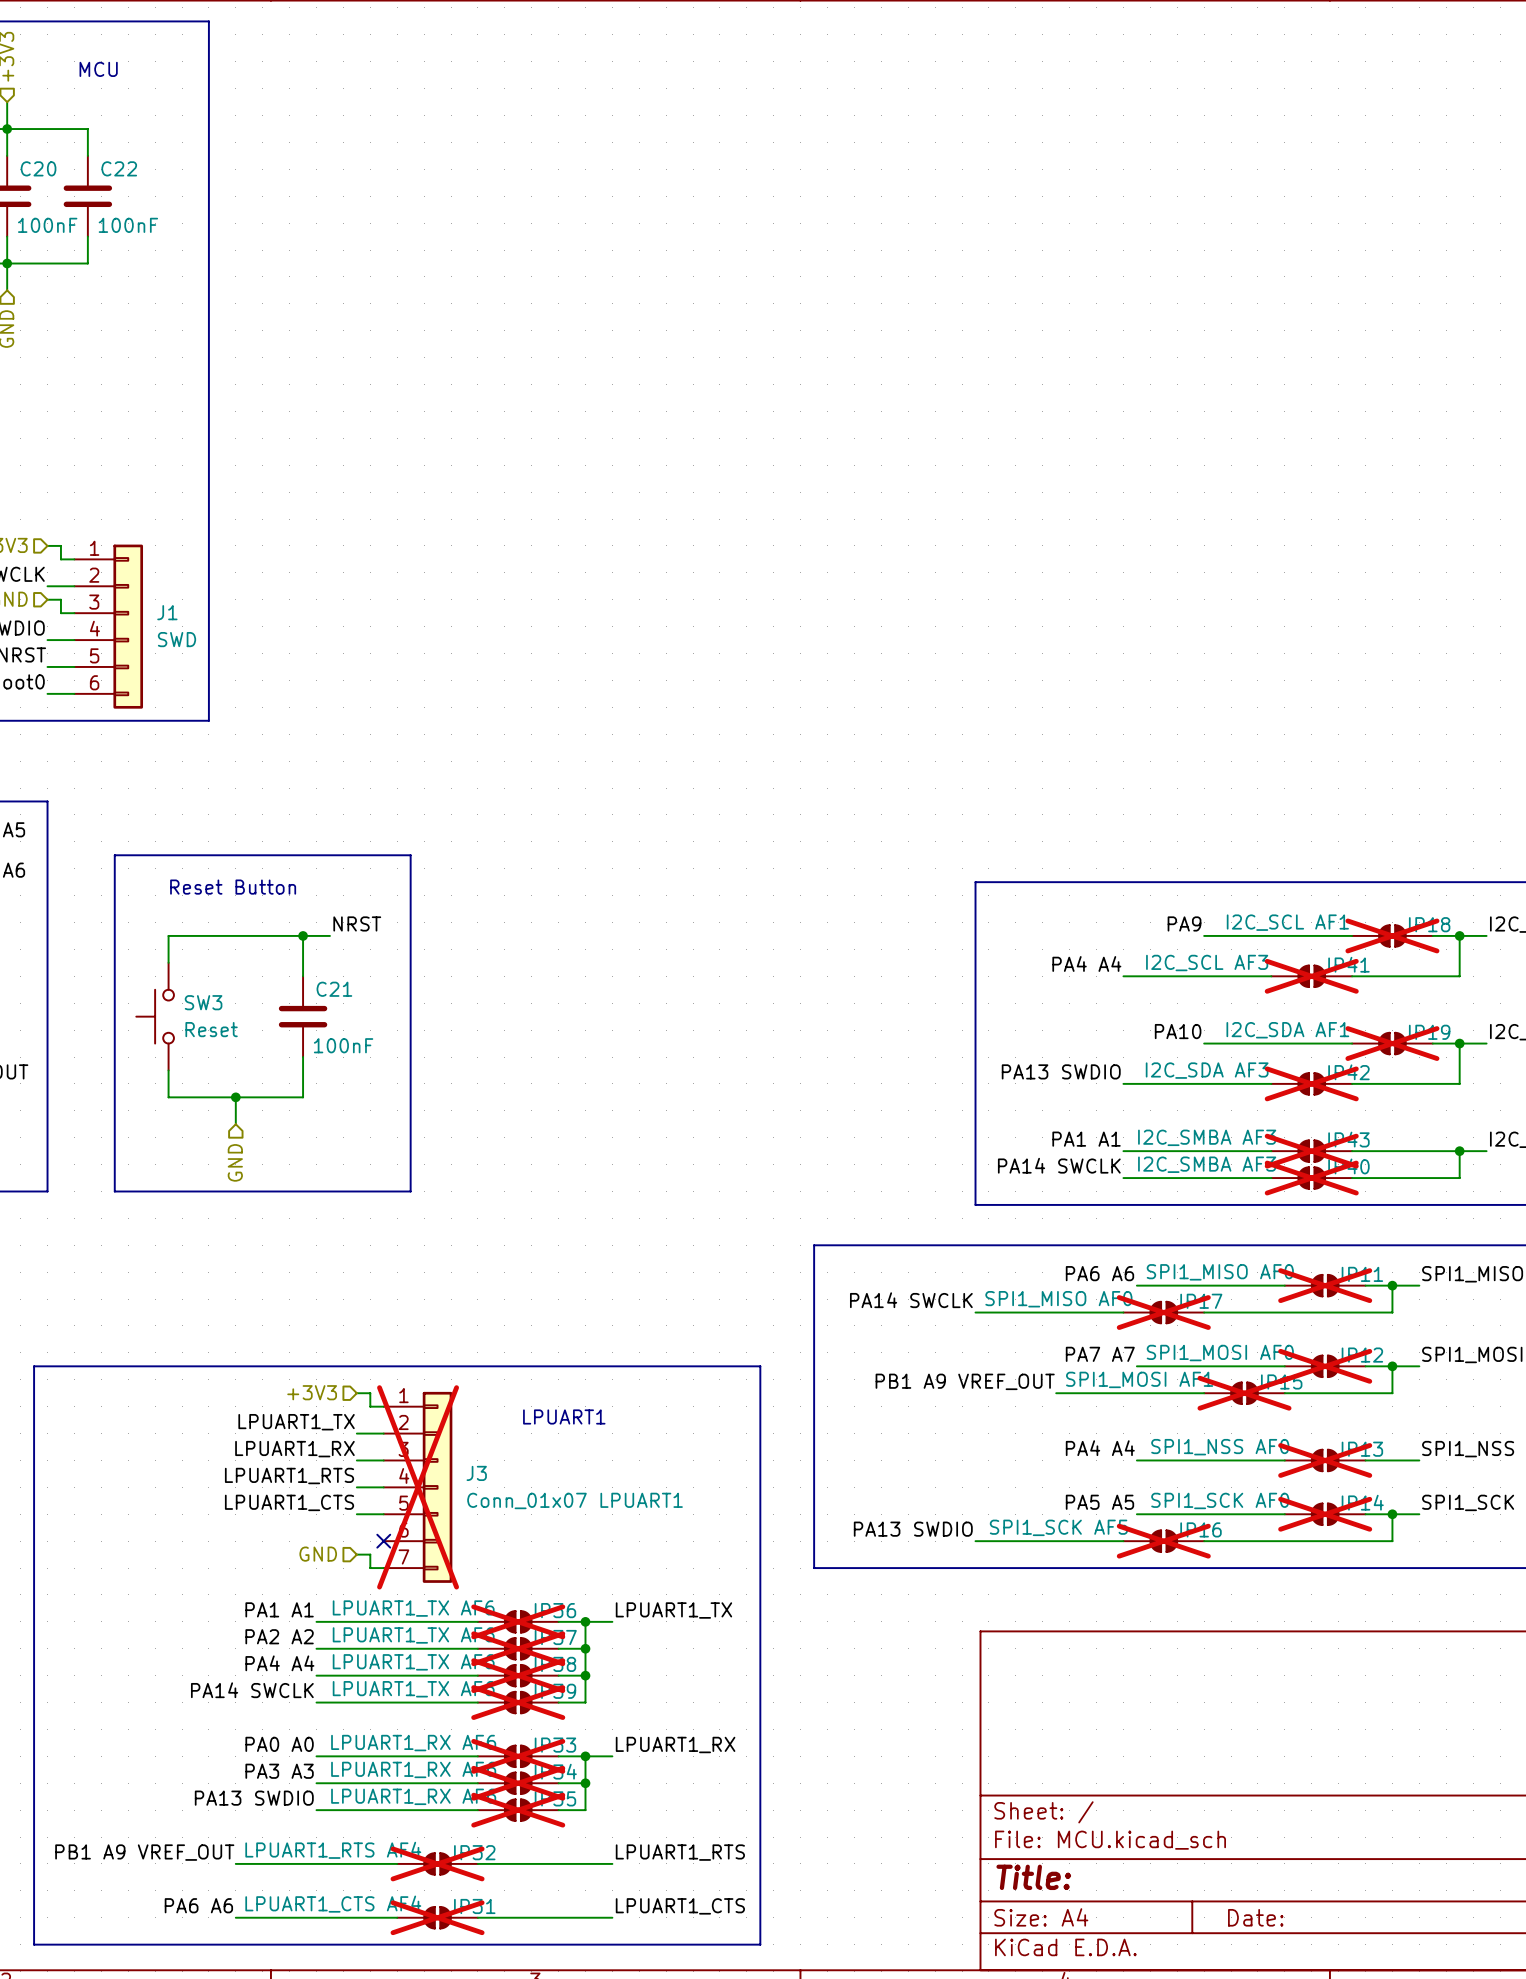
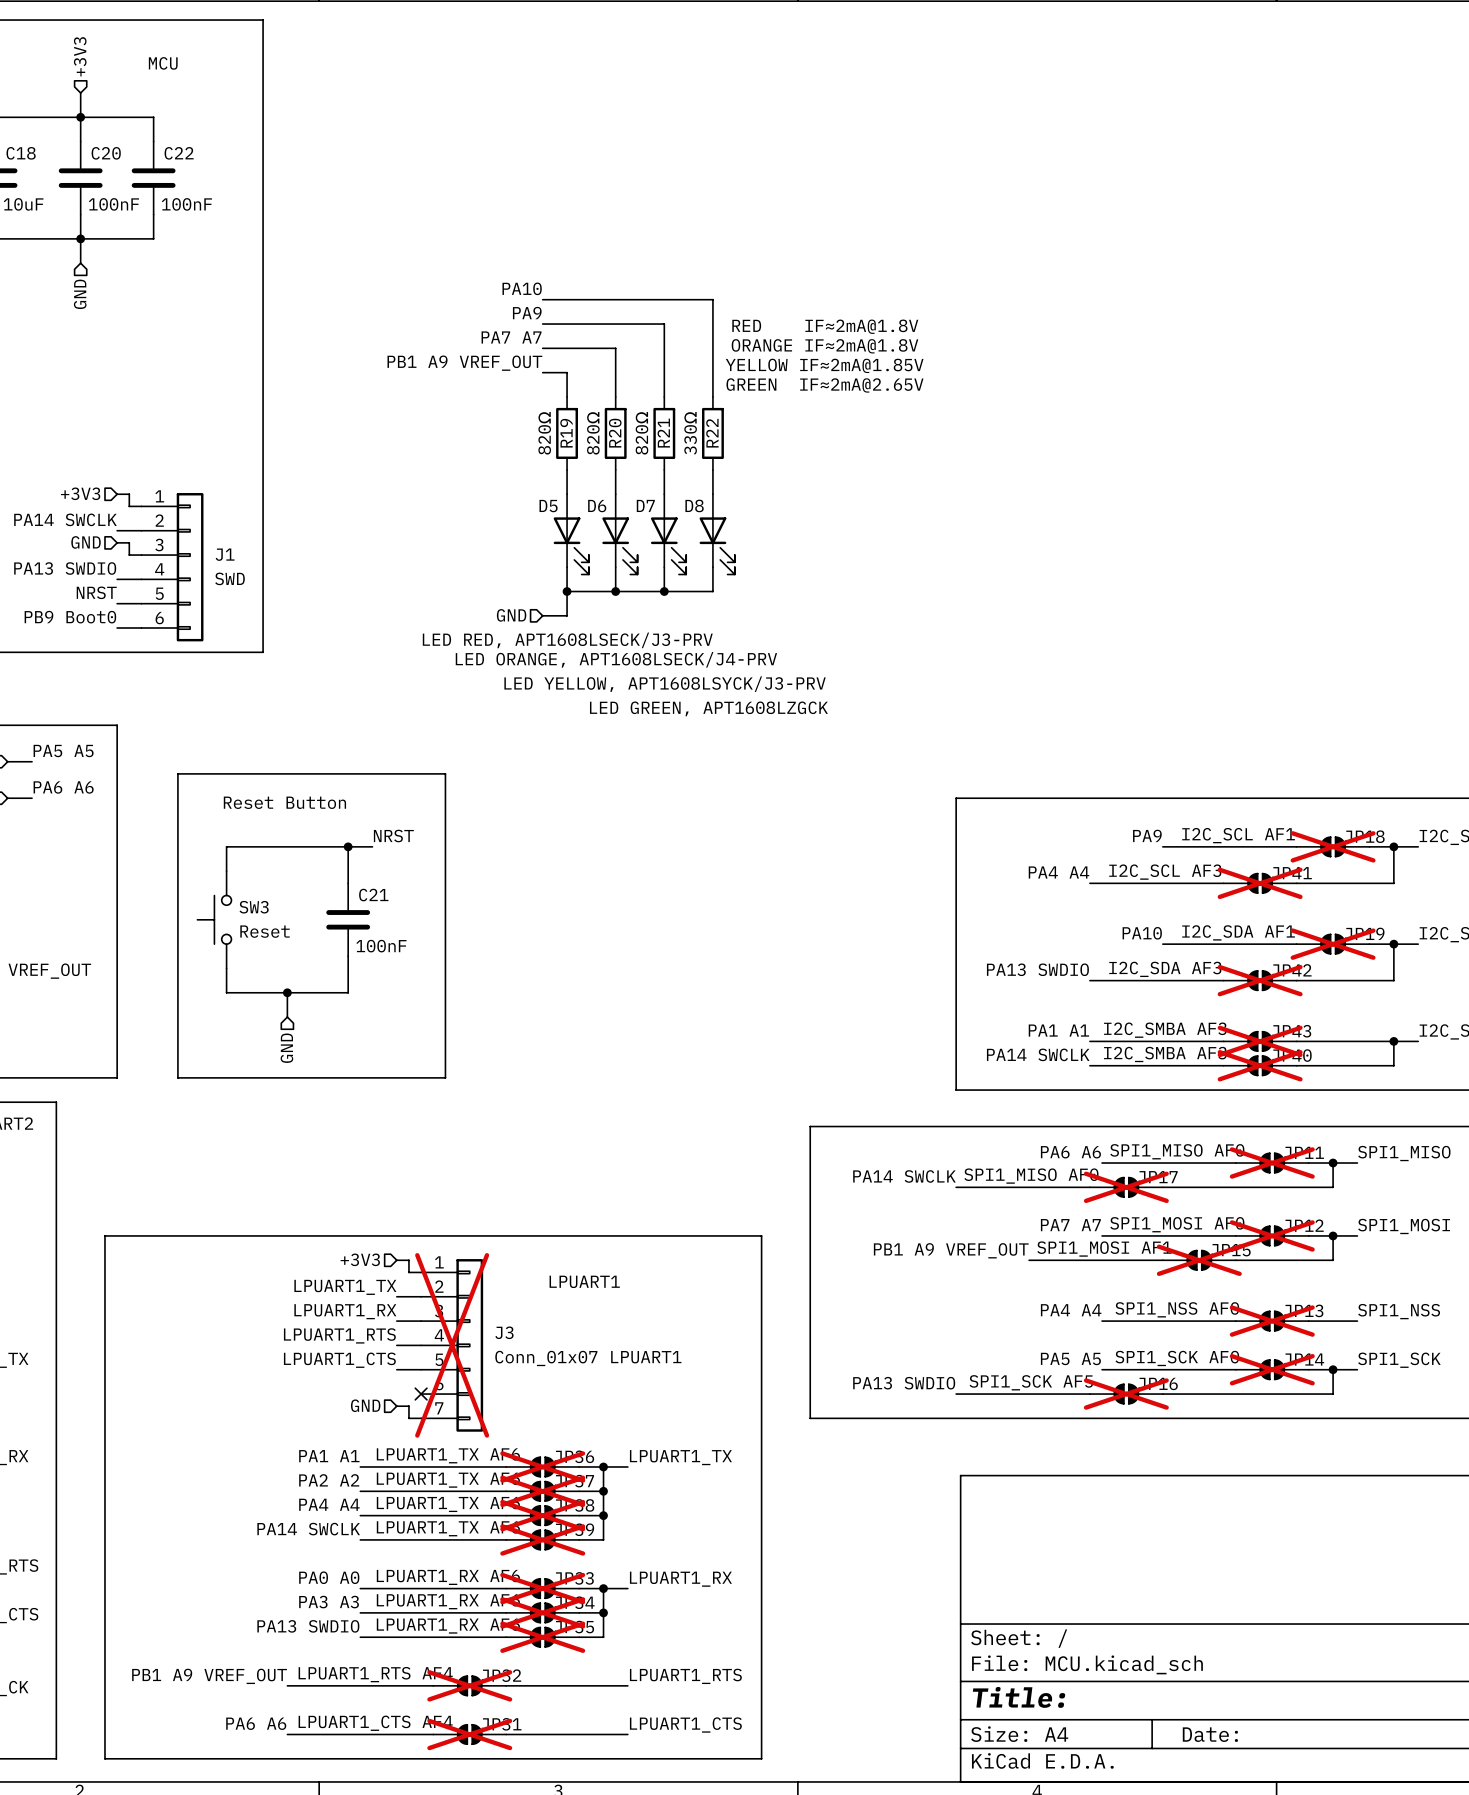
label: none -> PA10 (522, 288)
wire: none -> (542, 299) (712, 299) (712, 396)
label: none -> PA9 (527, 313)
wire: none -> (542, 324) (664, 324) (664, 396)
text: none -> RED IF≈2mA@1.8V (825, 326)
label: none -> PA7 A7 (511, 337)
text: none -> ORANGE IF≈2mA@1.8V (824, 346)
wire: none -> (542, 348) (615, 348) (615, 396)
label: none -> PB1 A9 VREF_OUT (464, 363)
text: none -> YELLOW IF≈2mA@1.85V (824, 365)
wire: none -> (542, 372) (567, 372) (567, 396)
text: none -> GREEN IF≈2mA@2.65V (824, 385)
R19: none -> 820Ω (567, 433)
R20: none -> 820Ω (615, 433)
R21: none -> 820Ω (664, 433)
R22: none -> 330Ω (712, 433)
wire: none -> (567, 469) (567, 494)
wire: none -> (615, 469) (615, 494)
wire: none -> (664, 469) (664, 494)
wire: none -> (712, 469) (712, 494)
D5: none -> LED RED, APT1608LSECK/J3-PRV (571, 534)
D6: none -> LED ORANGE, APT1608LSECK/J4-PRV (619, 534)
D7: none -> LED YELLOW, APT1608LSYCK/J3-PRV (668, 534)
D8: none -> LED GREEN, APT1608LZGCK (717, 534)
wire: none -> (567, 567) (567, 615) (542, 615)
wire: none -> (615, 567) (615, 591)
wire: none -> (664, 567) (664, 591)
wire: none -> (712, 567) (712, 591) (567, 591)
junction: none -> (567, 591)
junction: none -> (615, 591)
junction: none -> (664, 591)
hierarchical label: none -> GND (511, 615)

